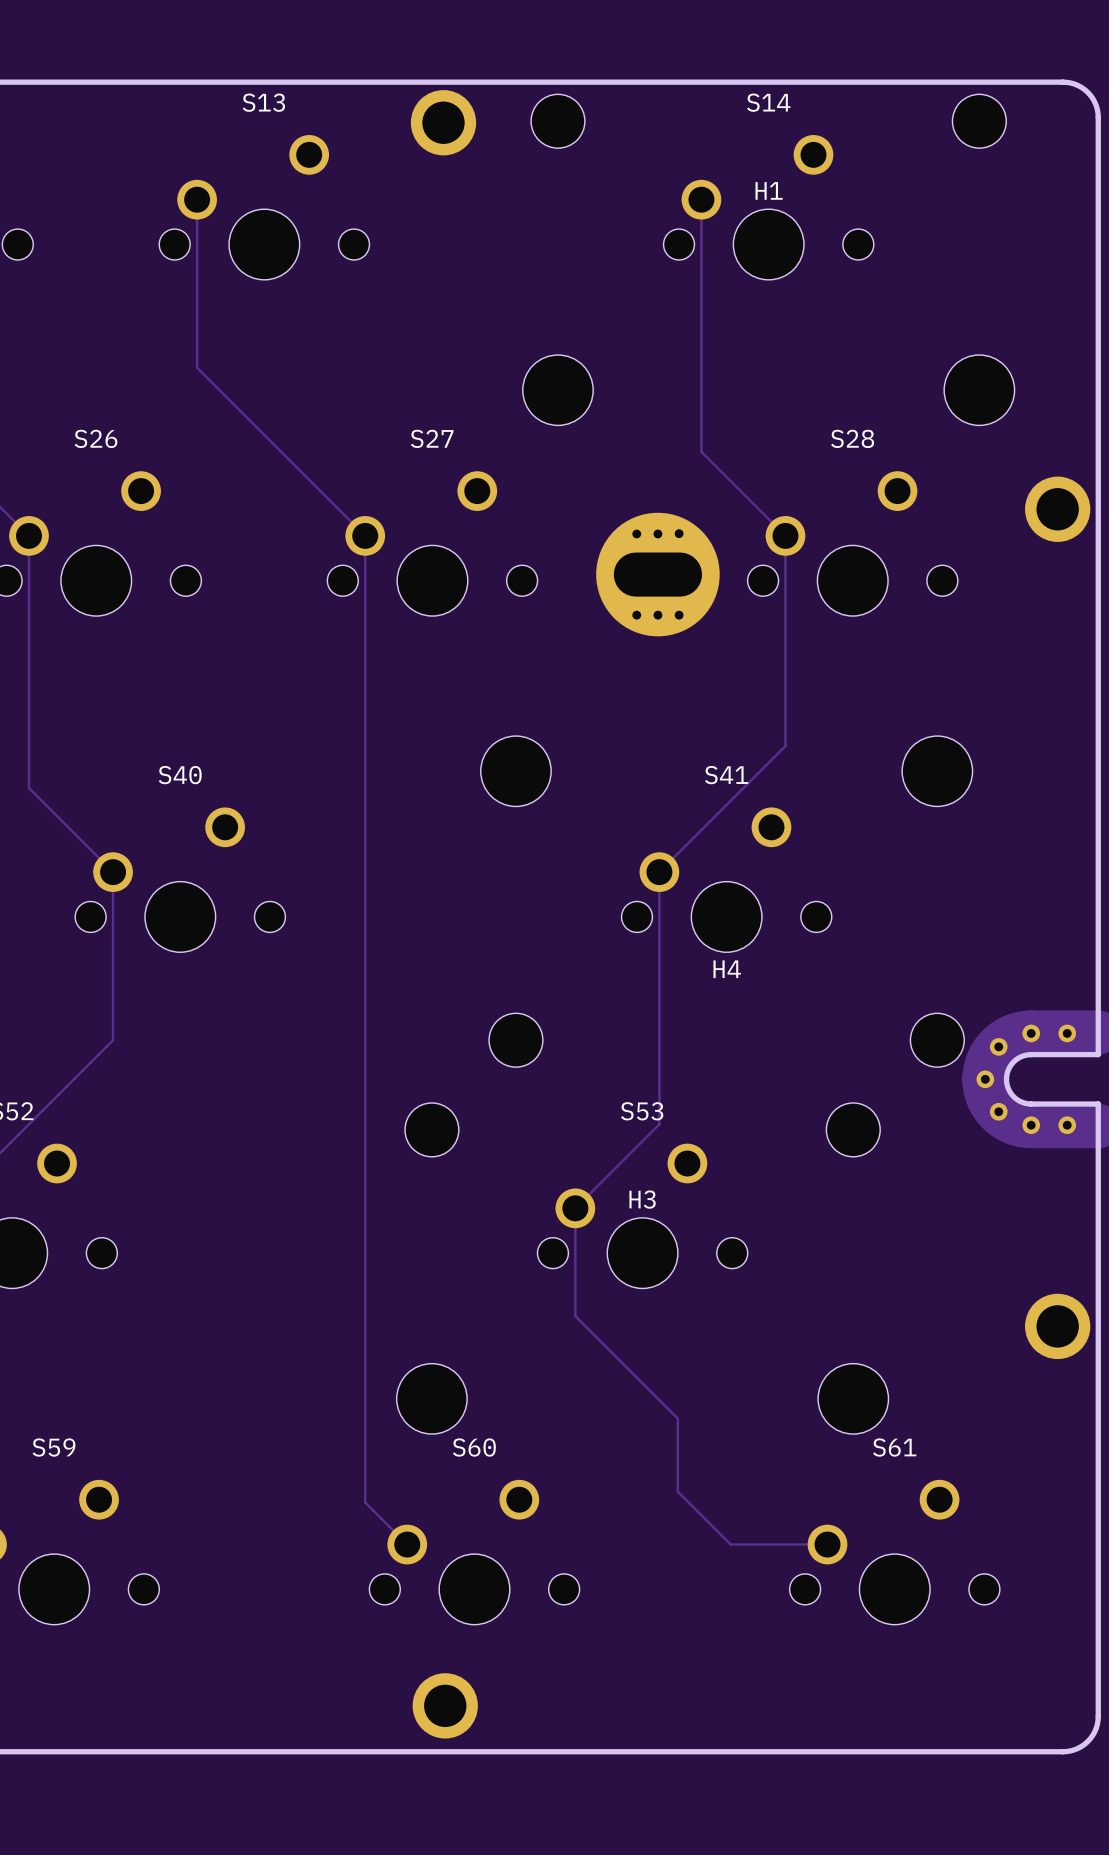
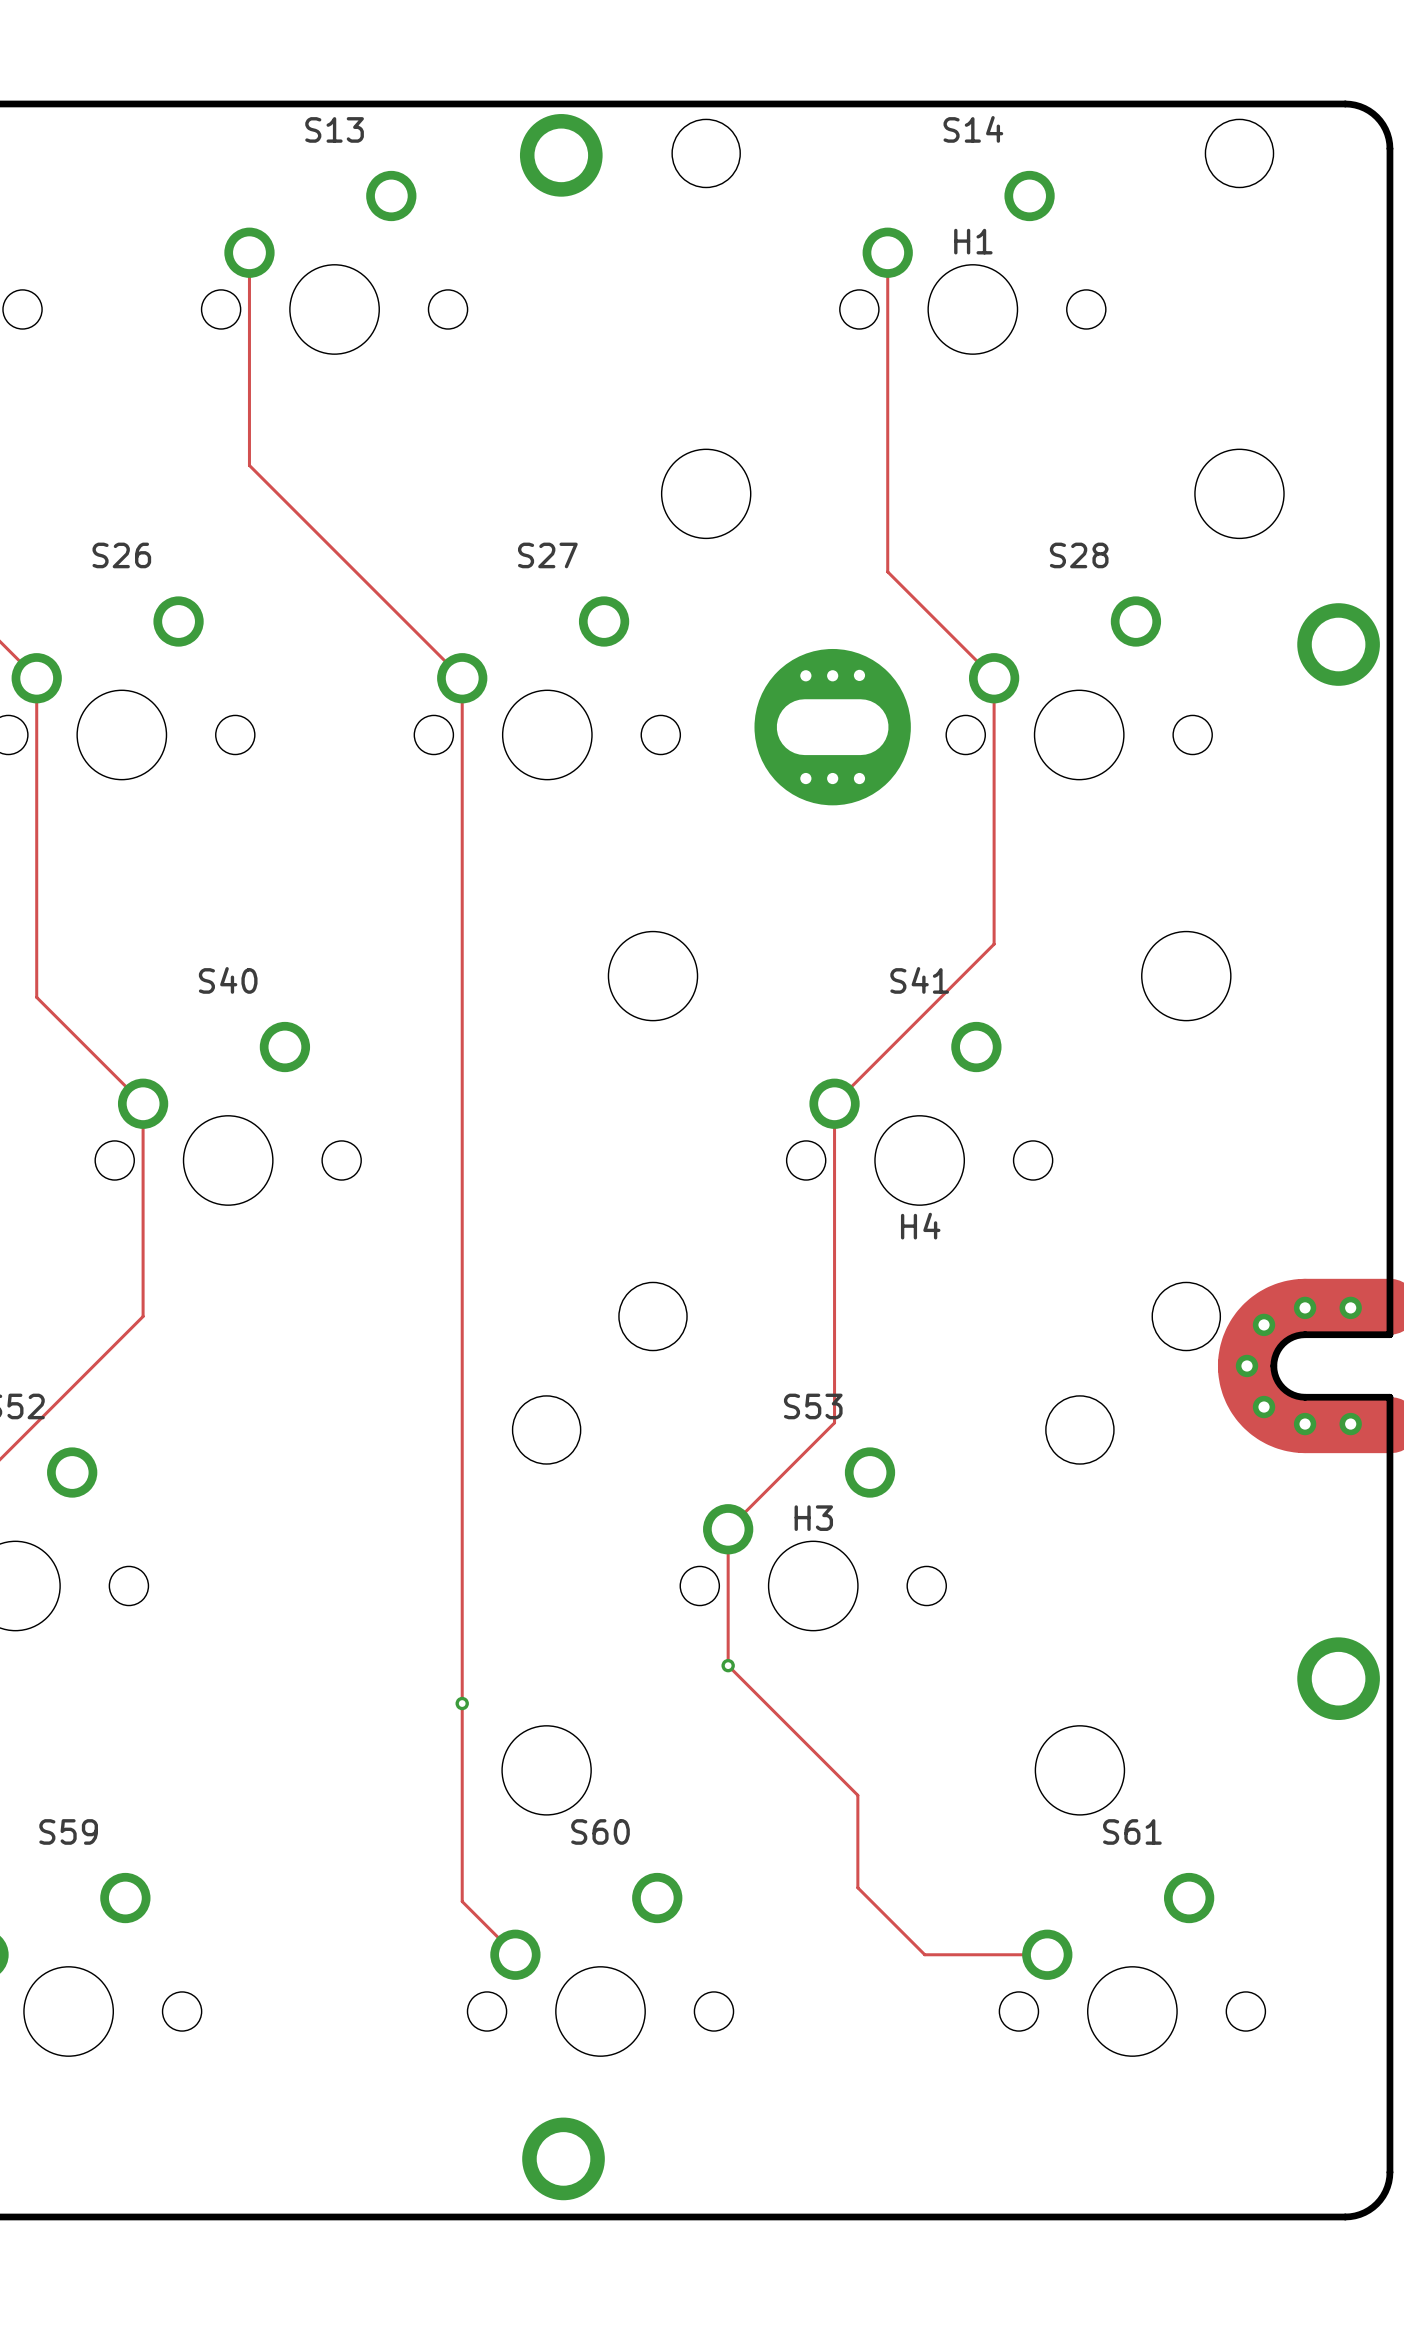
via: none -> (728, 1665)
via: none -> (462, 1703)

